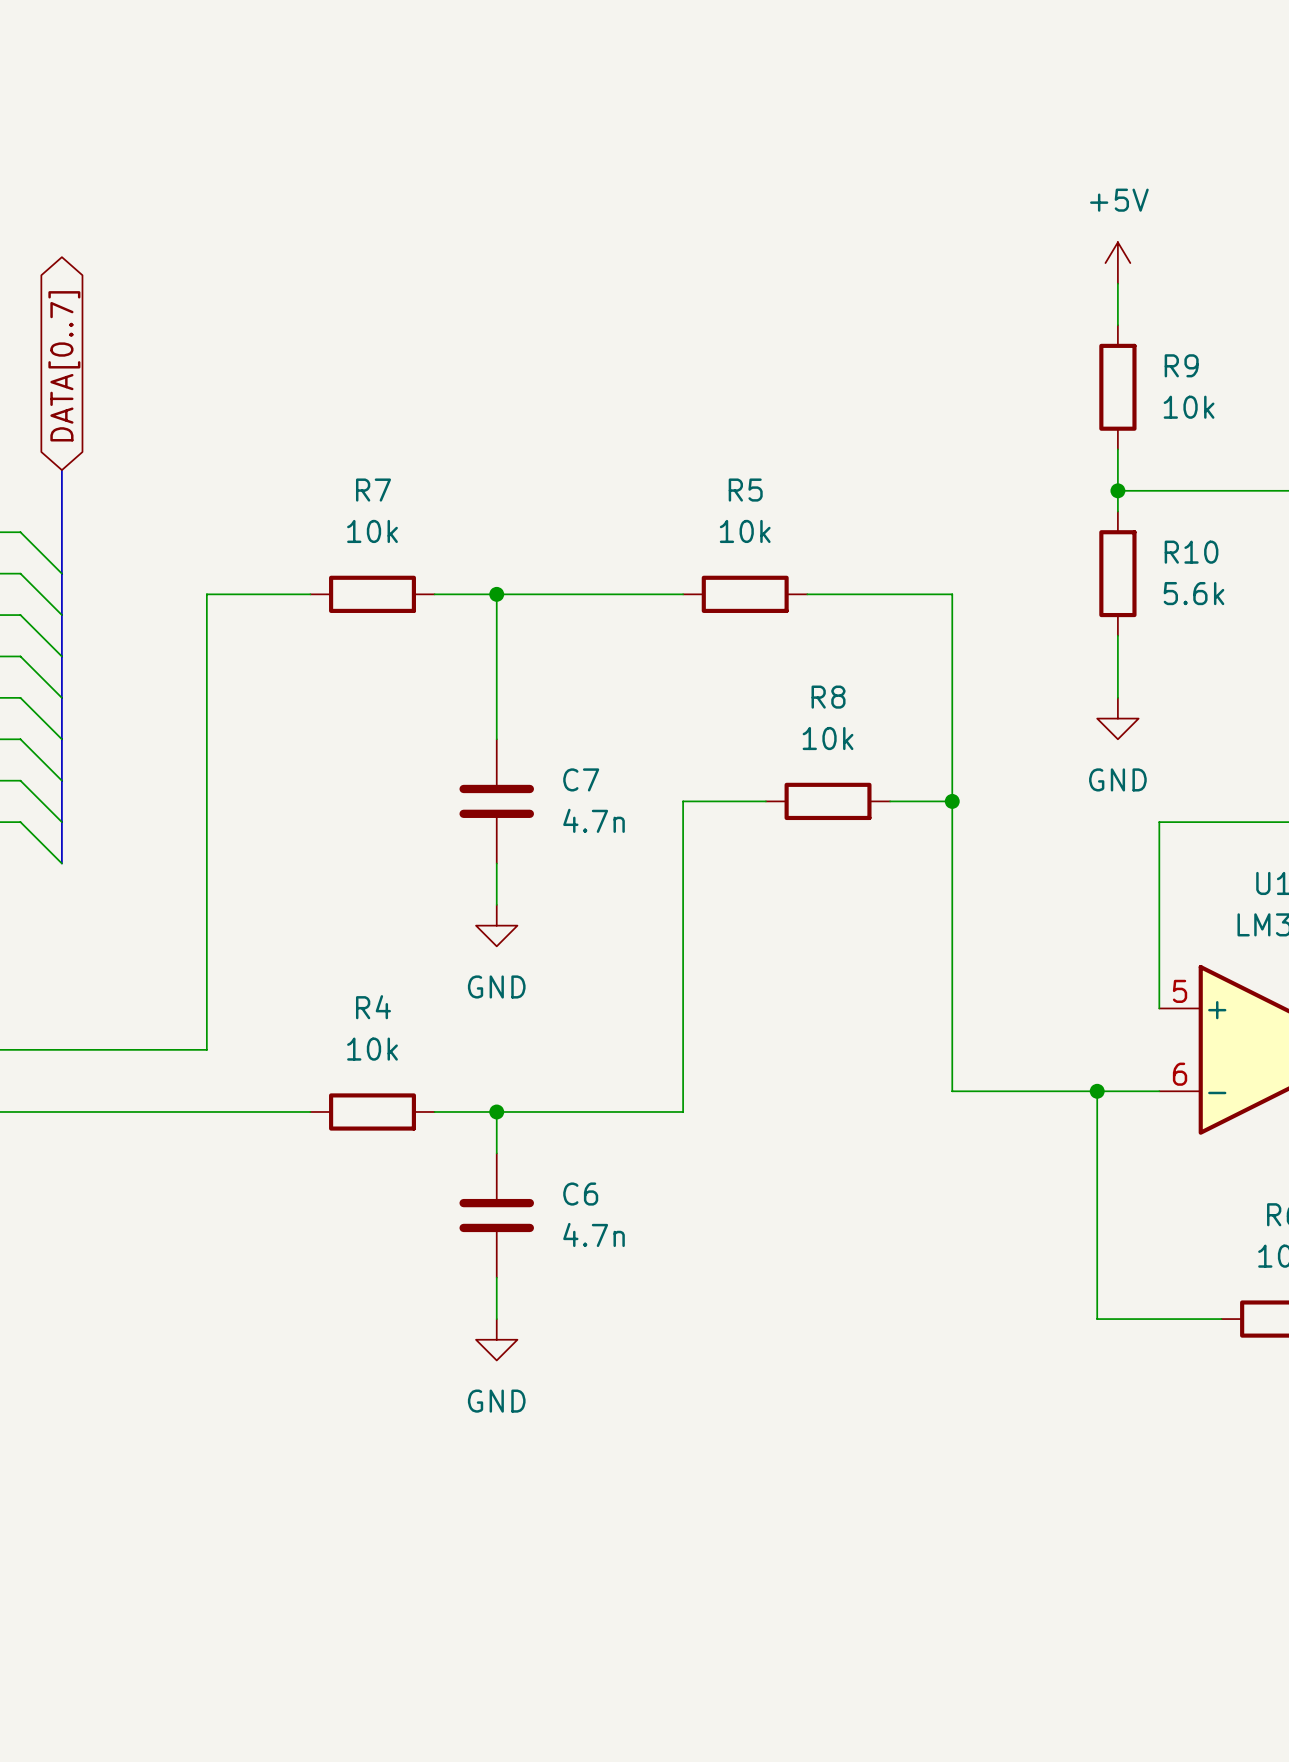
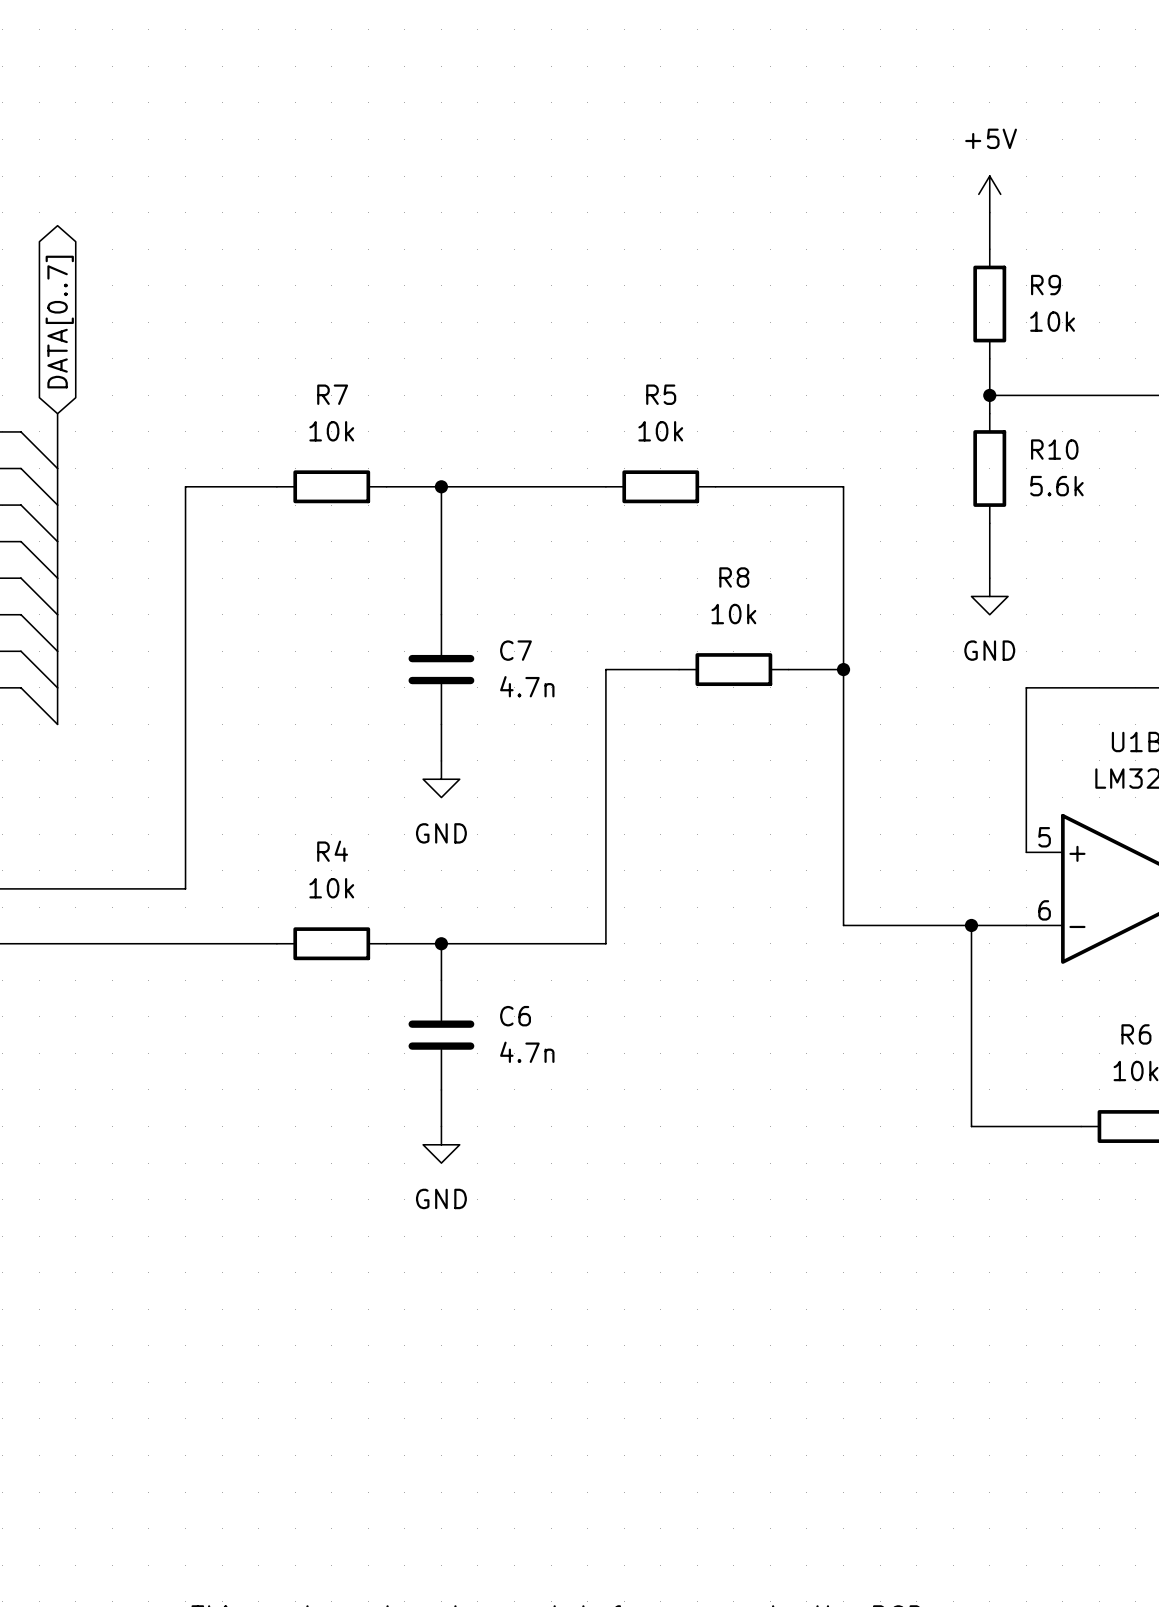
global label position: DATA[0..7] (64, 366) -> DATA[0..7] (59, 322)
bus: (61, 470) (61, 511) -> none

